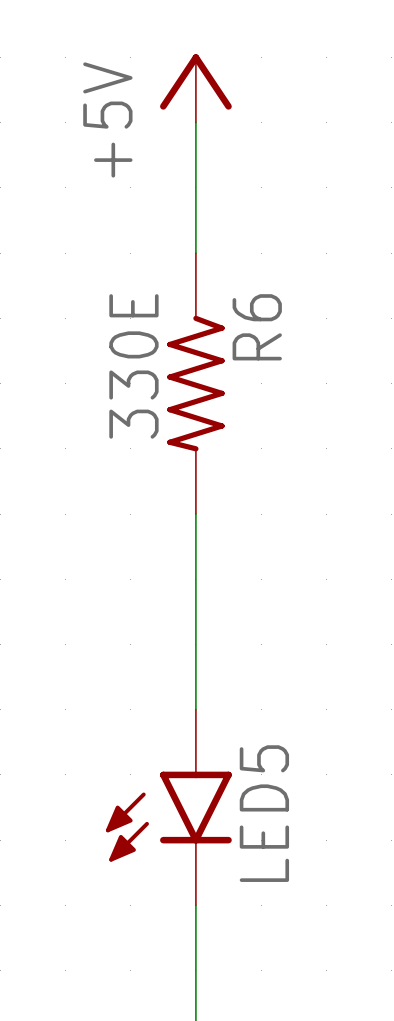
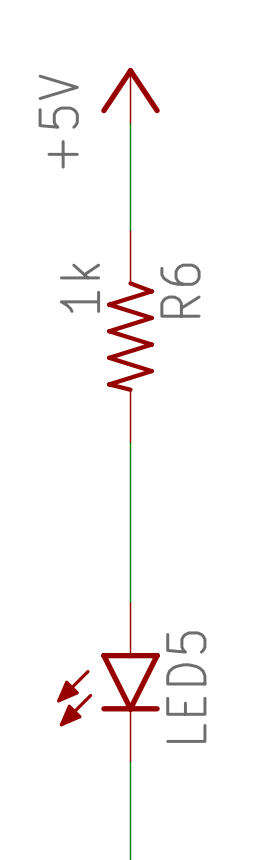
R6 value: 330E (133, 366) -> 1k (79, 288)

